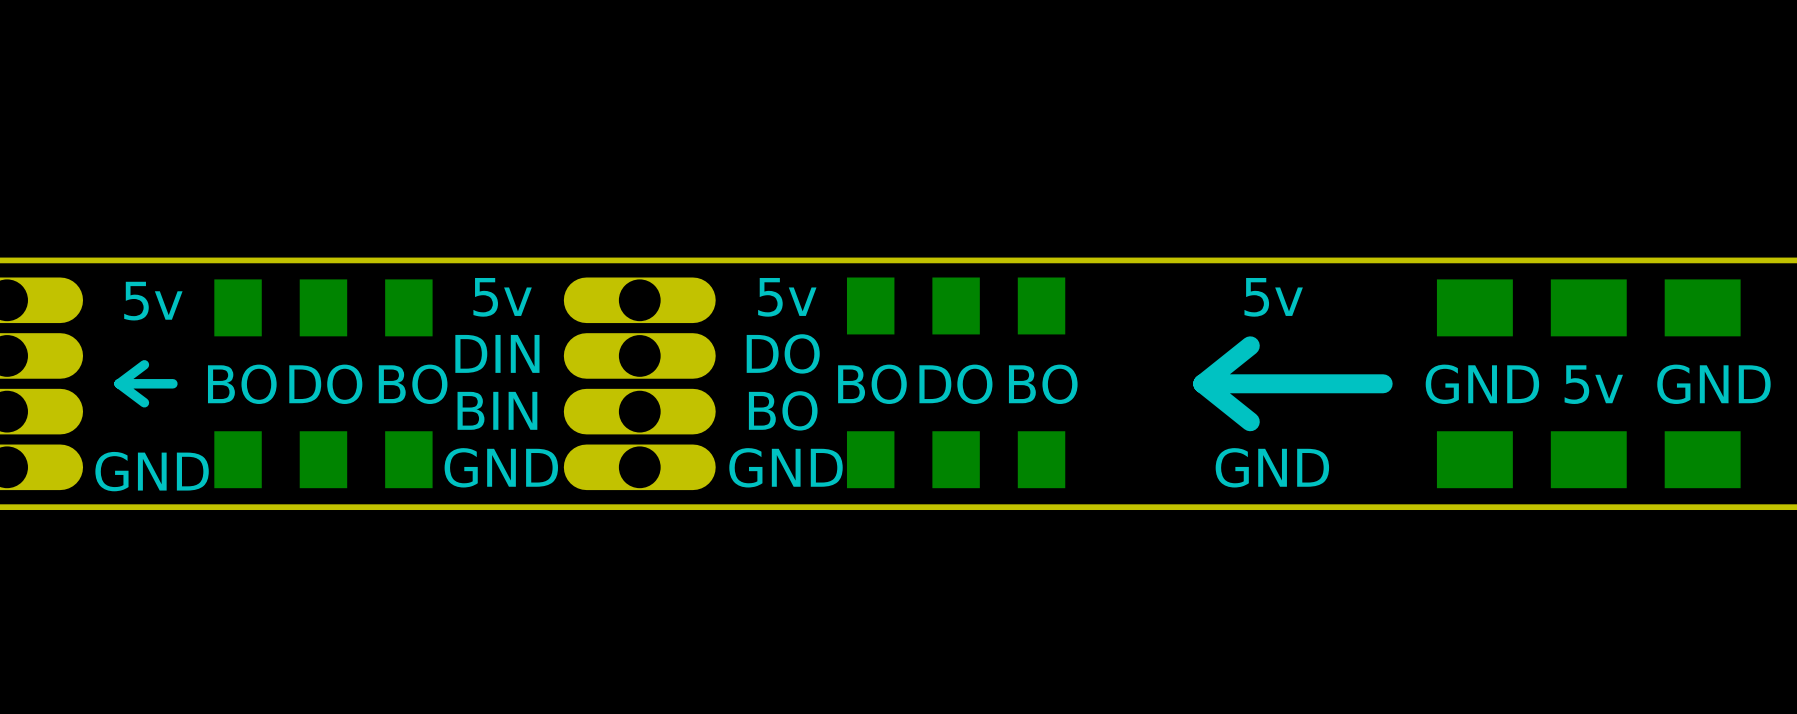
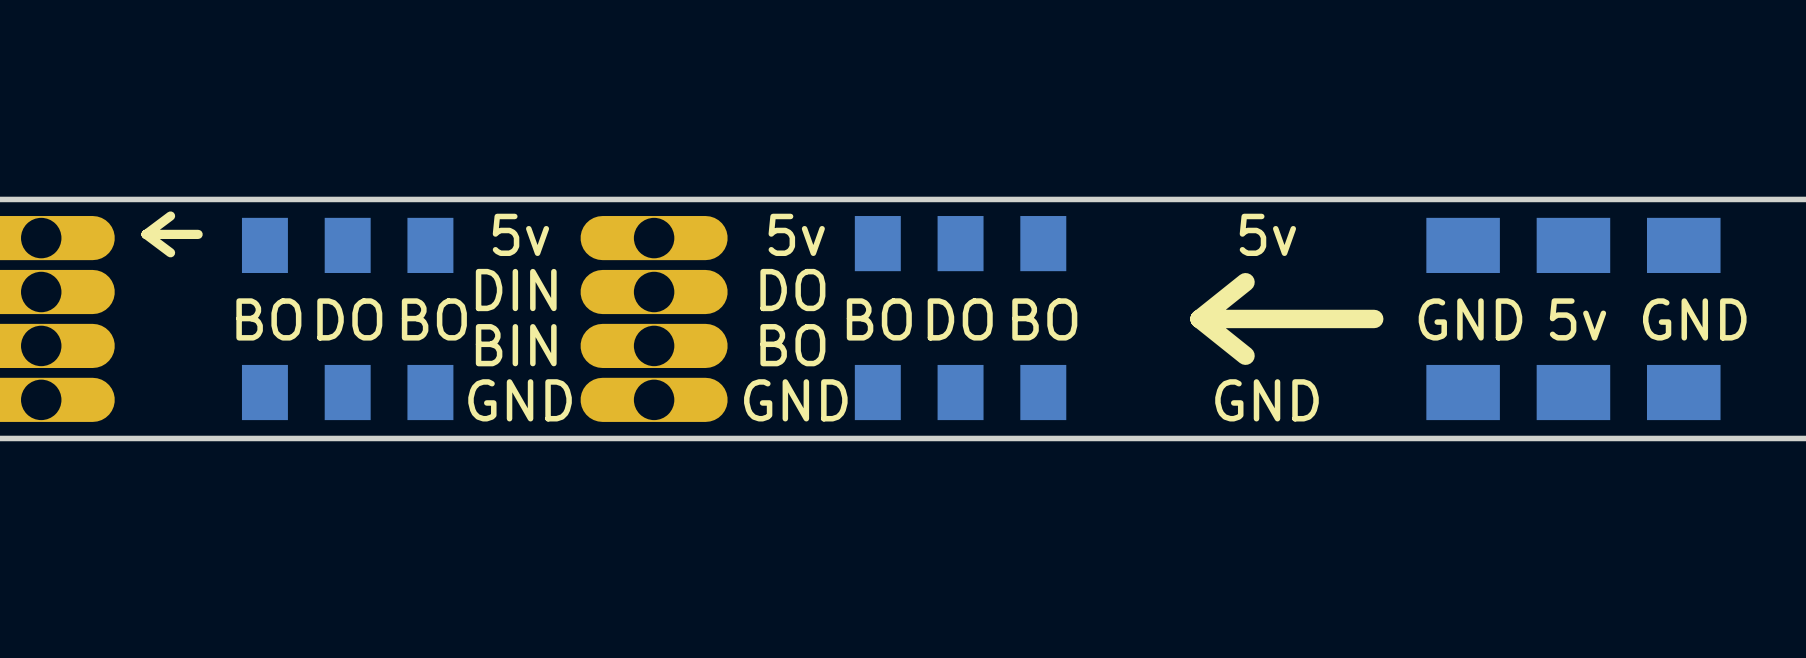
text: 5v (153, 301) -> none
line: (144, 364) (119, 383) -> (170, 216) (146, 234)
line: (119, 383) (144, 402) -> (146, 234) (170, 252)
line: (172, 383) (119, 383) -> (198, 234) (146, 234)
text: GND (152, 471) -> none

